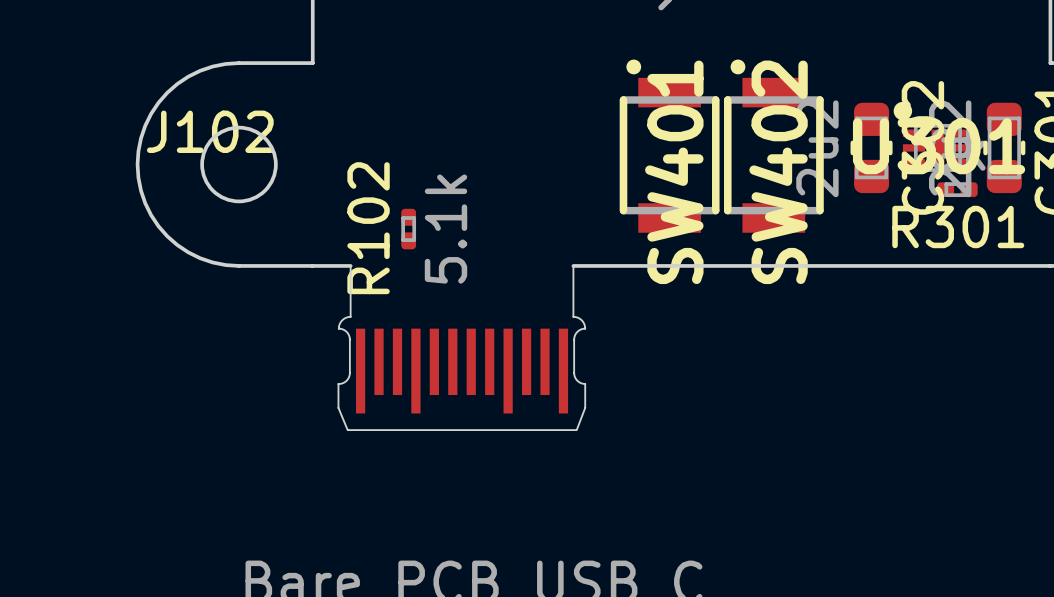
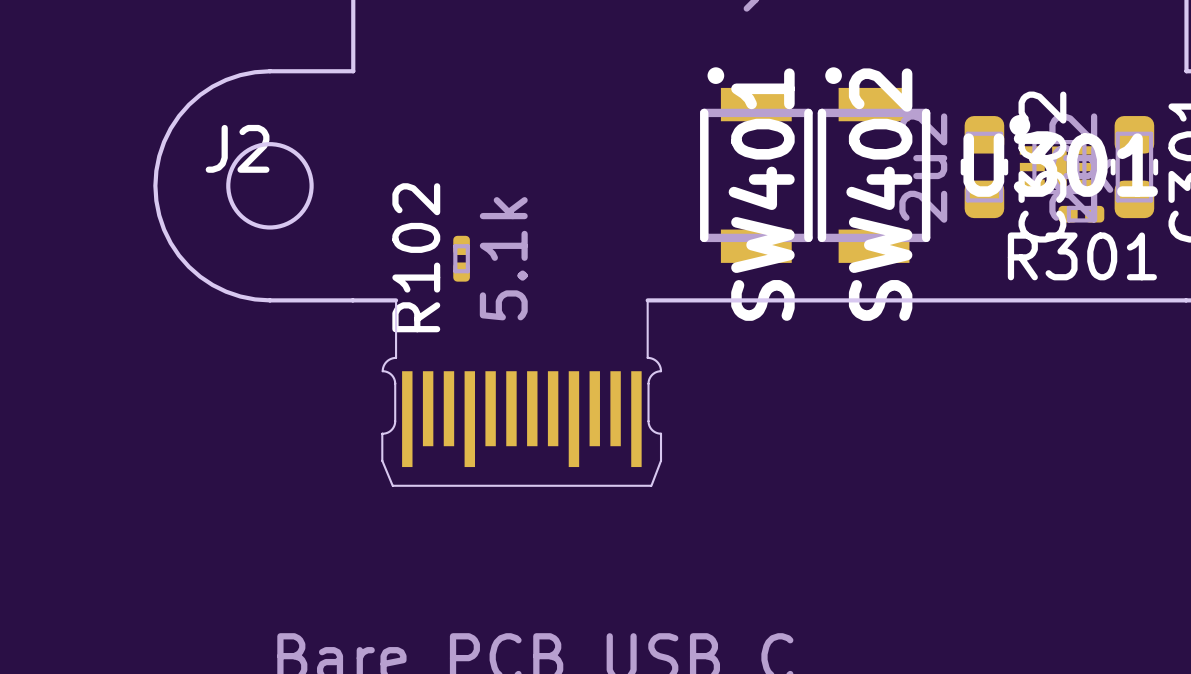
J102 name: J102 (210, 131) -> J2 (237, 148)

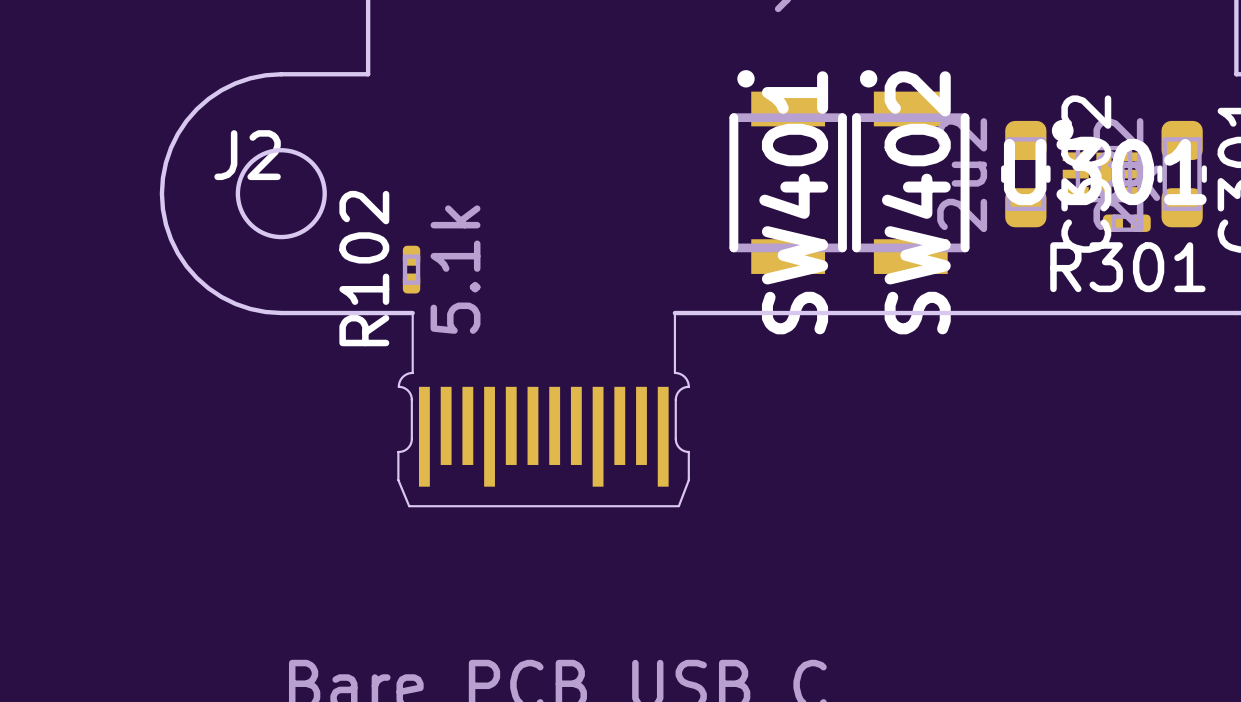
R102 position: (461, 258) -> (411, 269)

